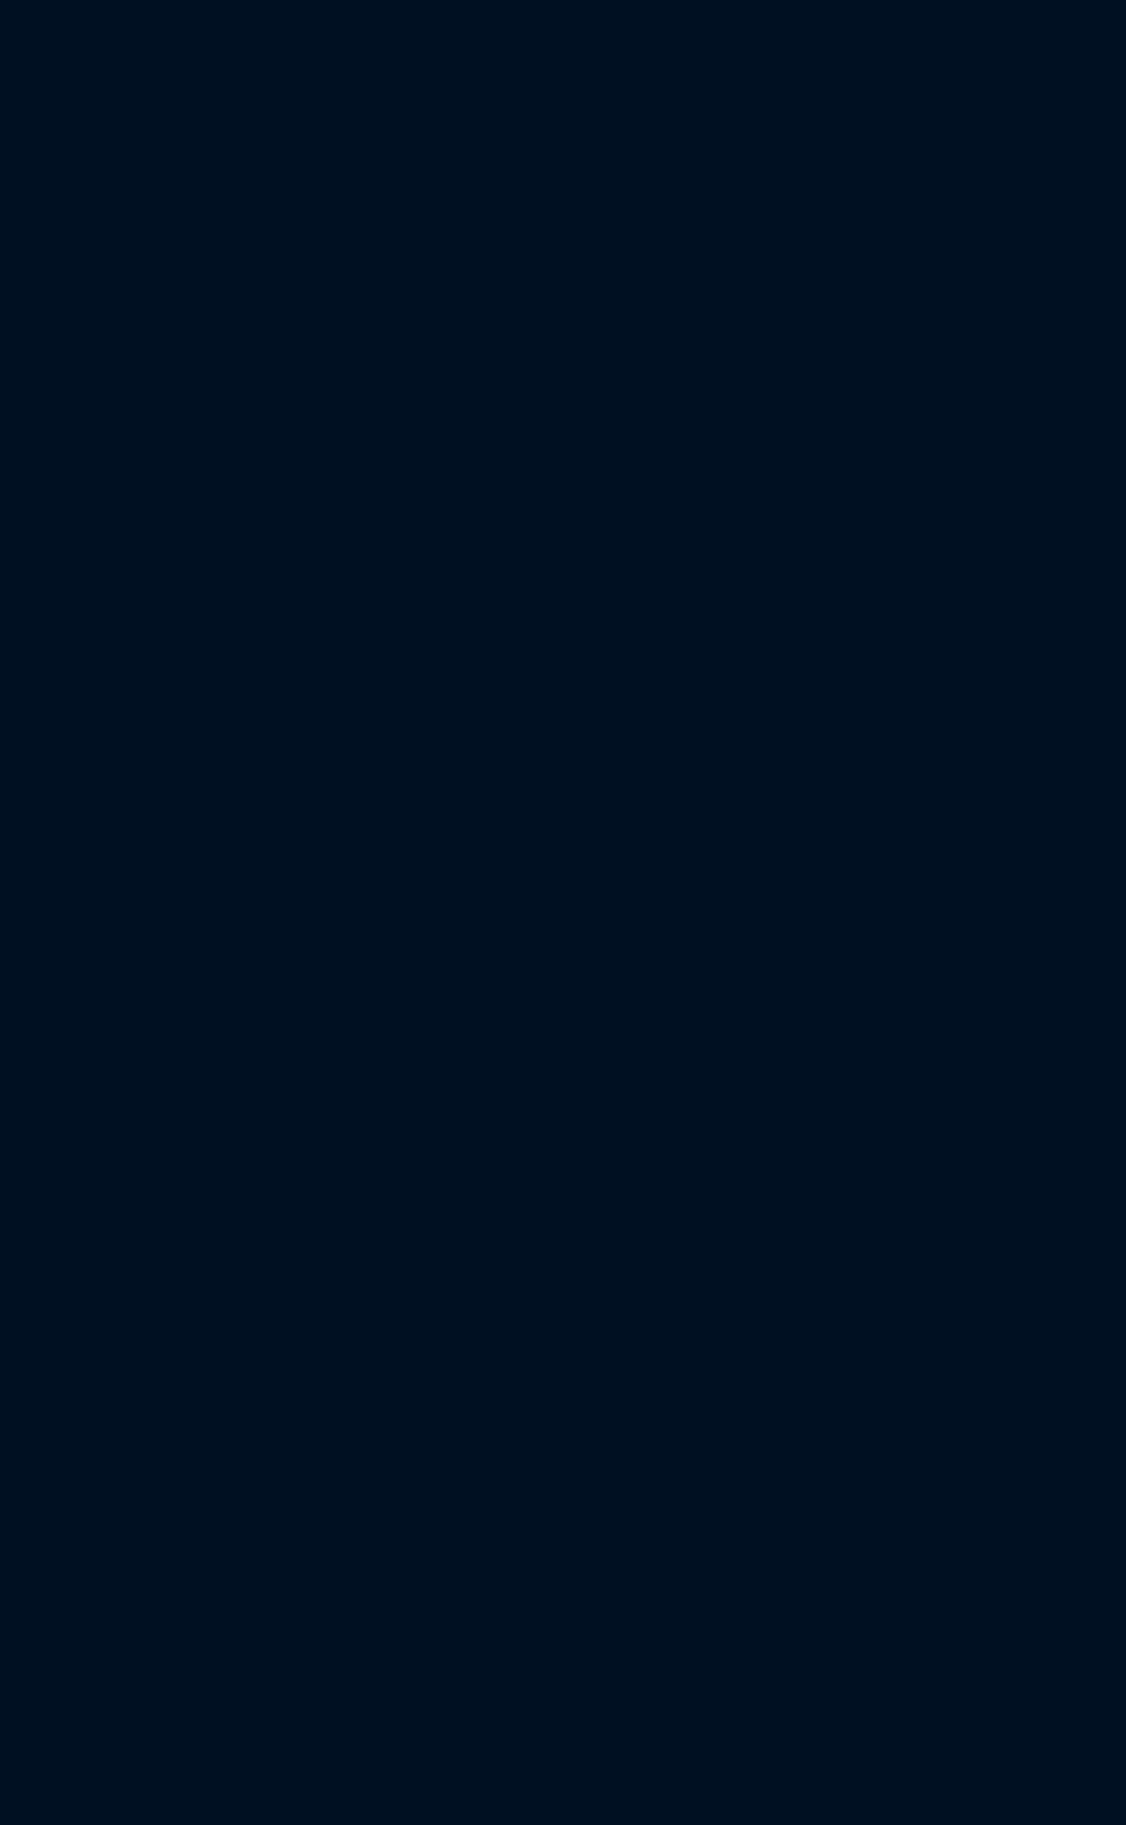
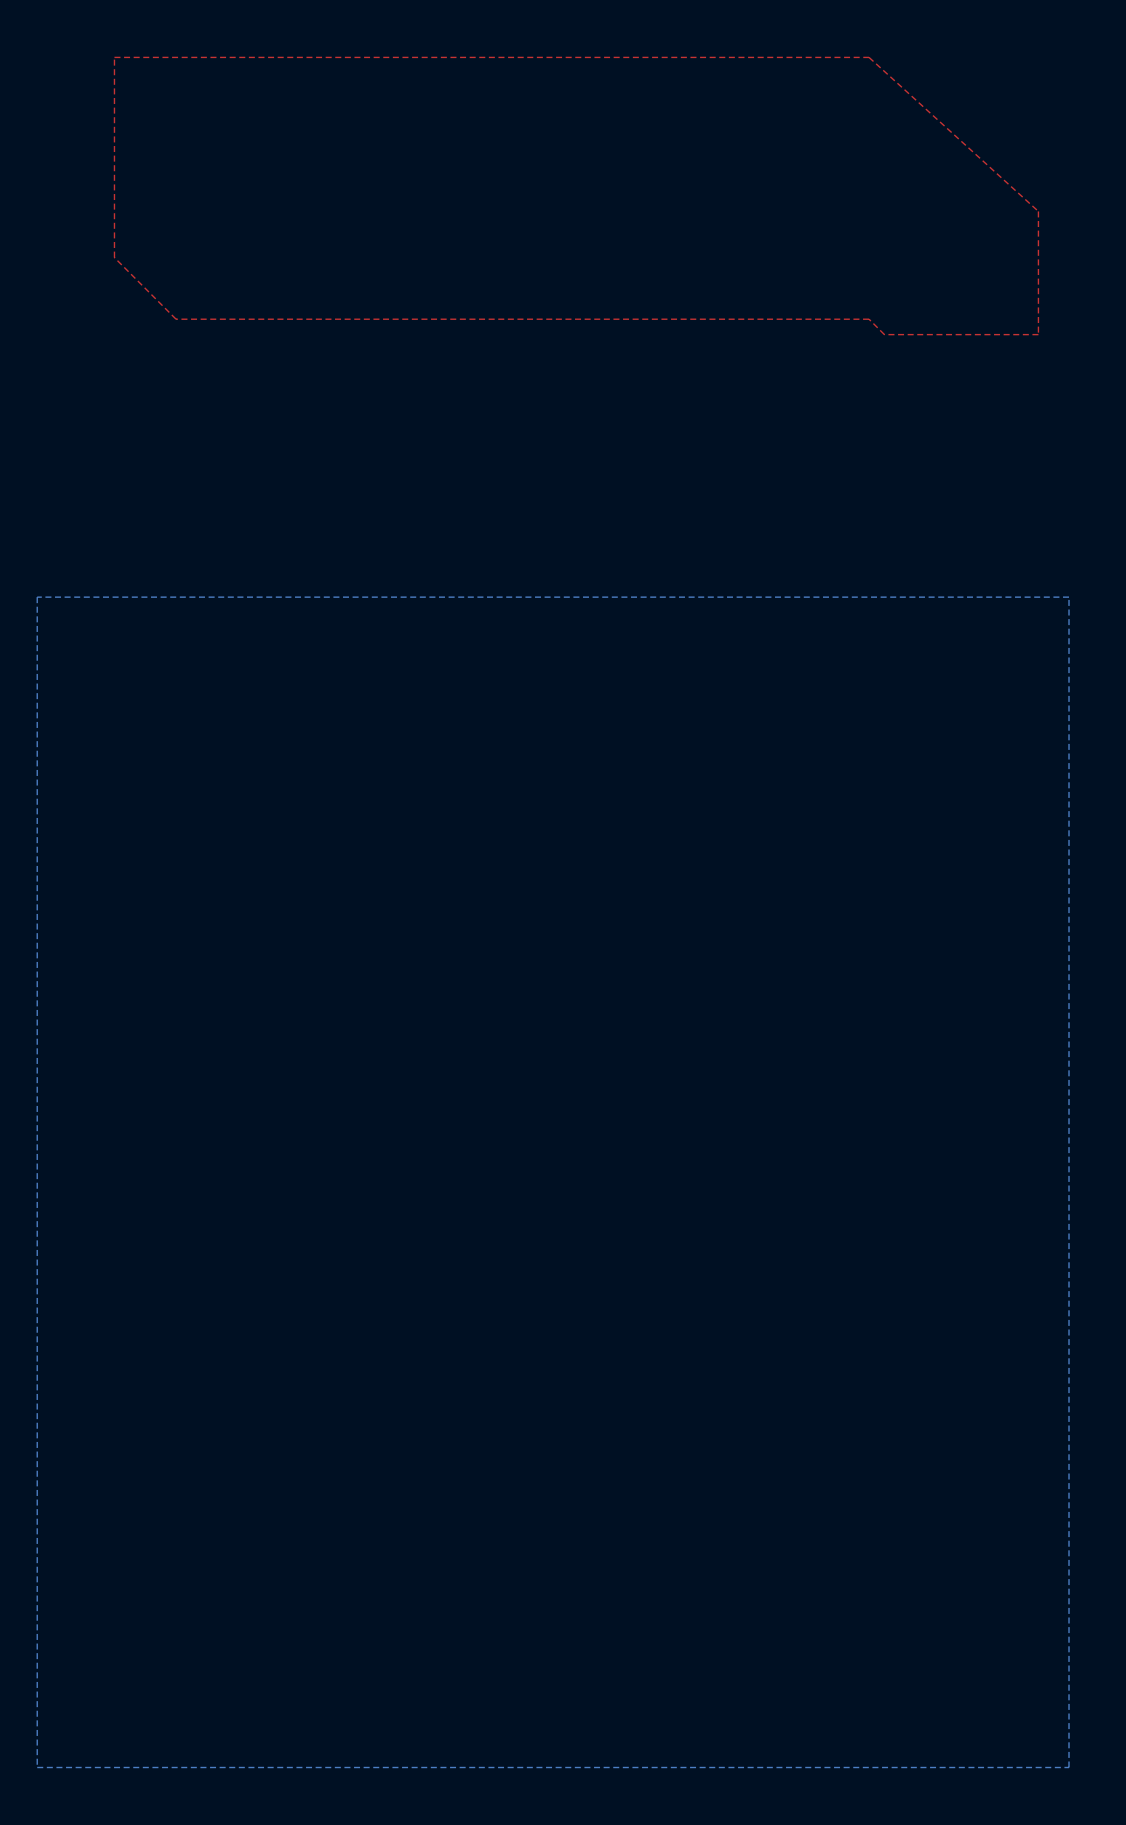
top zone outline: none -> (114, 57) (114, 257) (176, 319) (869, 319) (884, 334) (1038, 334) (1038, 211) (869, 57) (114, 57)
bottom zone outline: none -> (37, 597) (1069, 597) (1069, 1767) (37, 1767) (37, 597)

